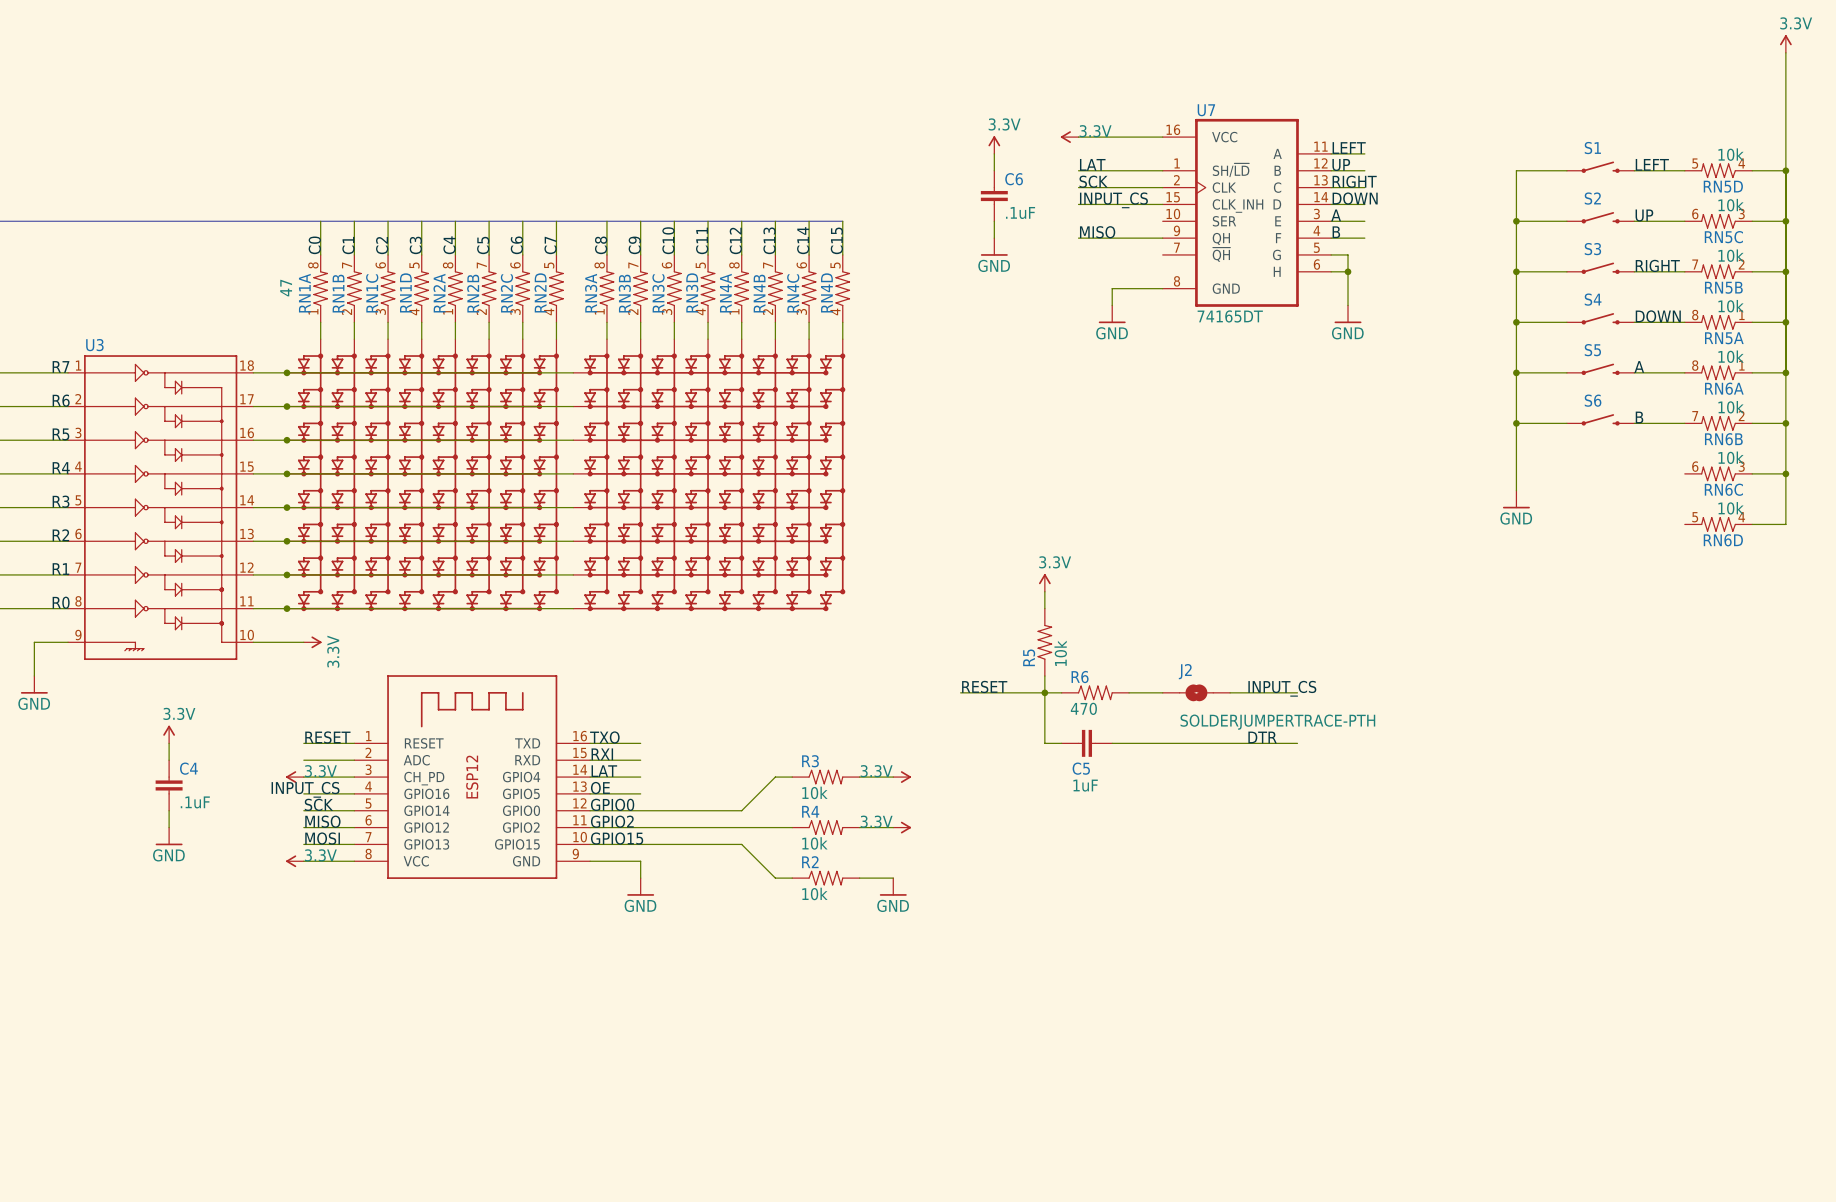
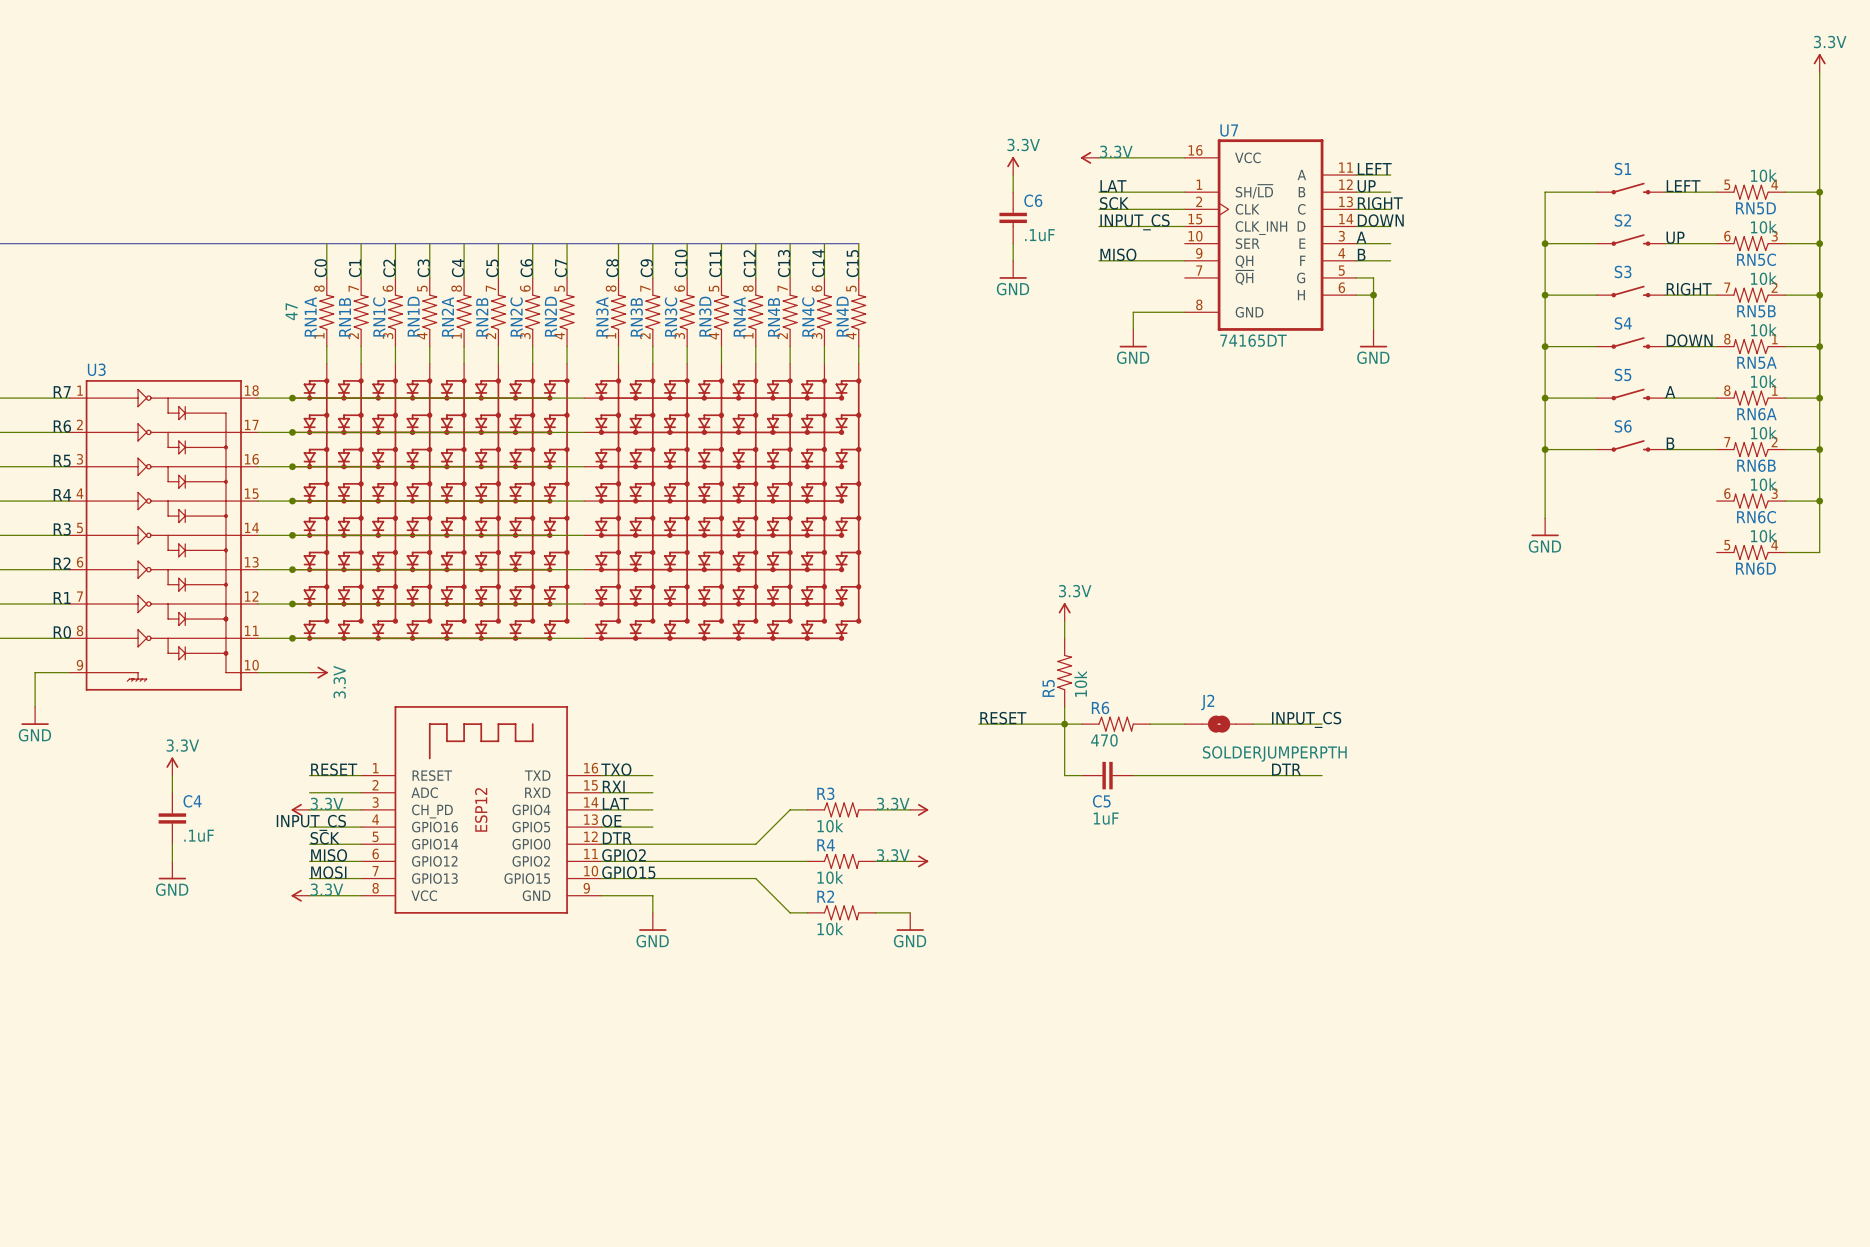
J2 value: SOLDERJUMPERTRACE-PTH (1277, 722) -> SOLDERJUMPERPTH (1274, 753)
label: GPIO0 (612, 804) -> DTR (617, 838)

